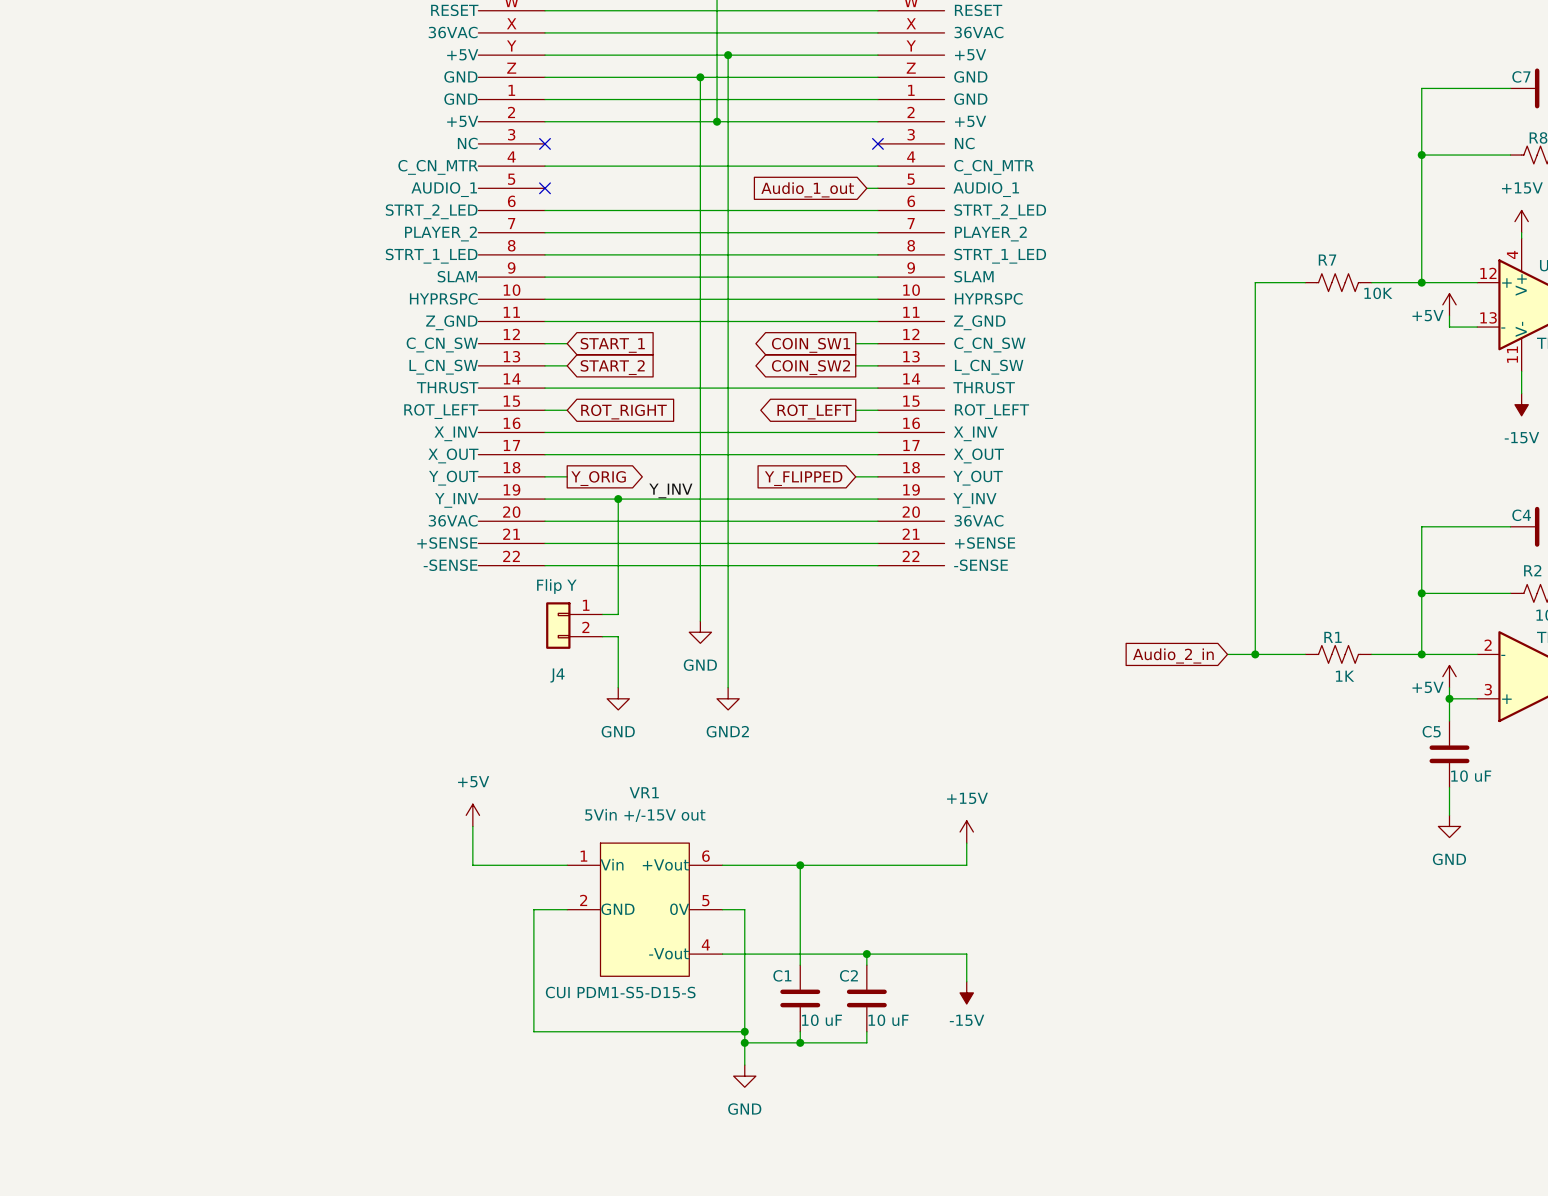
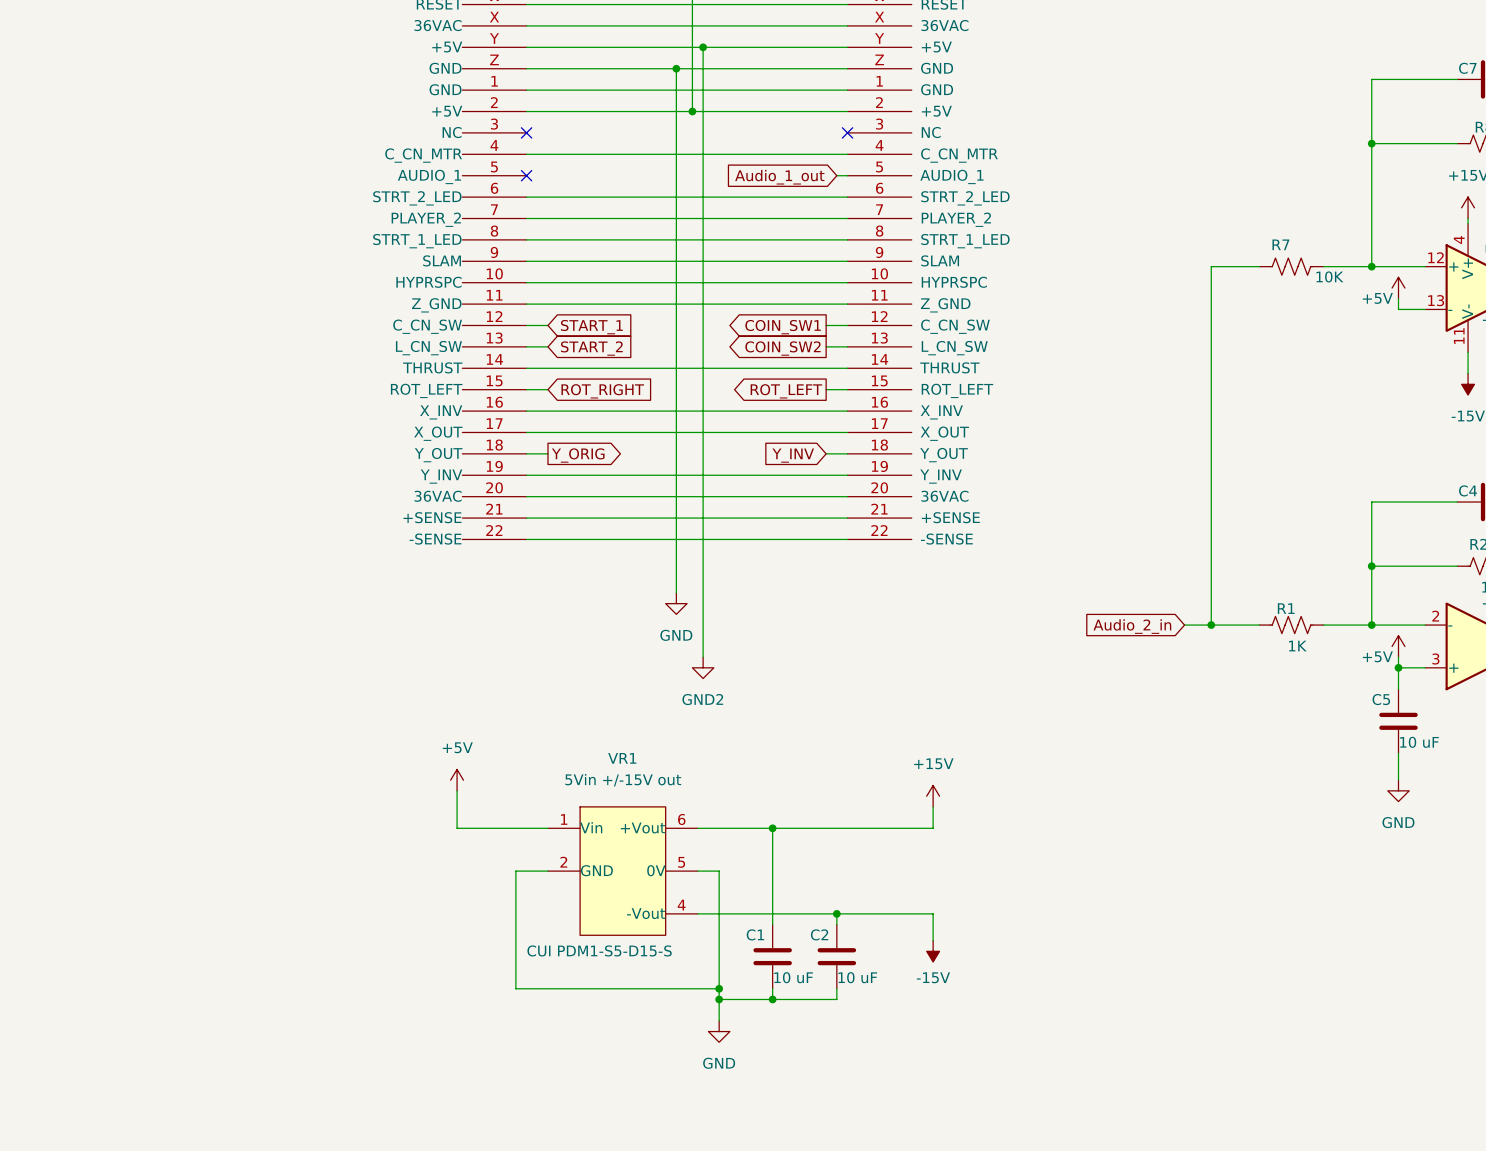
global label: Y_FLIPPED (803, 478) -> Y_INV (793, 455)
label: Y_INV (670, 490) -> none
wire: (618, 499) (618, 614) (602, 614) -> none
junction: (618, 499) -> none
J4: (574, 625) -> none
wire: (602, 636) (618, 636) (618, 687) -> none
power symbol: GND (618, 698) -> none

